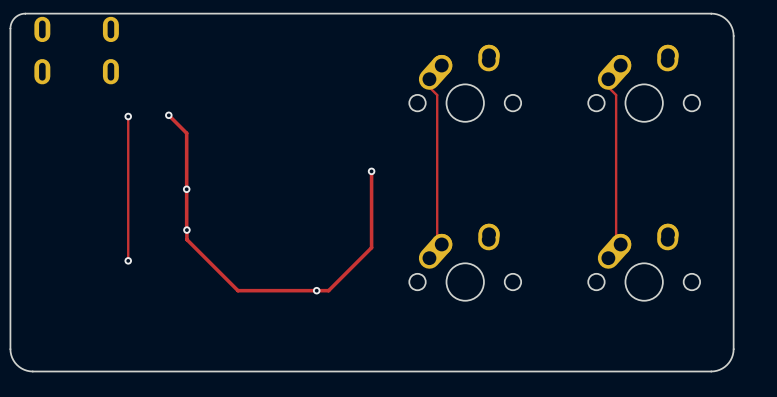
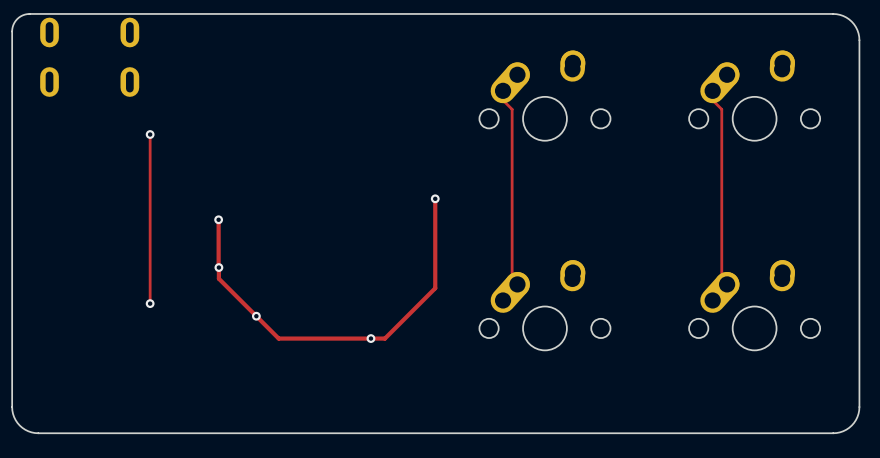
track: (168, 115) (186, 133) (186, 189) -> none
via: (168, 115) -> none
via: none -> (256, 316)

